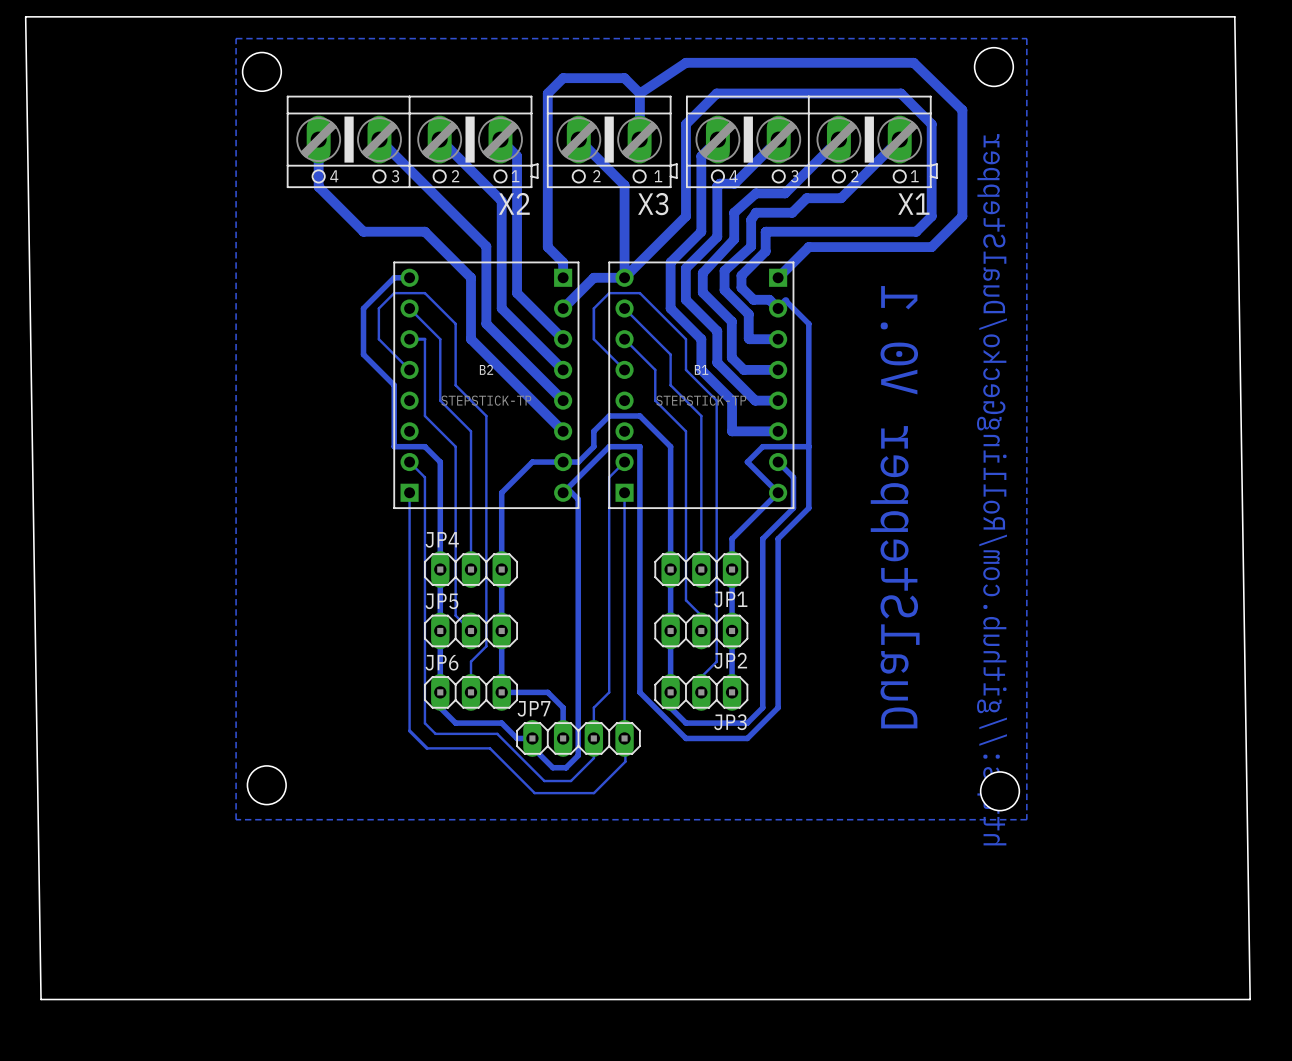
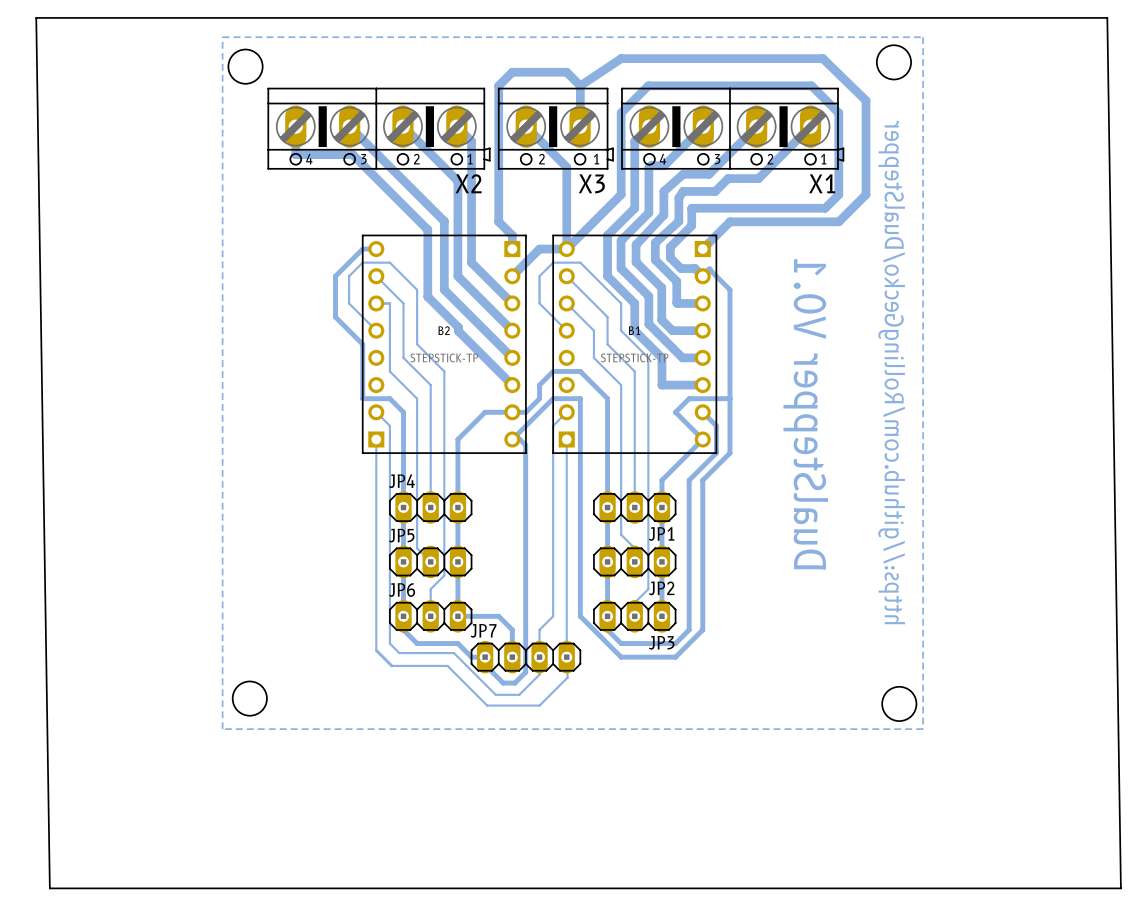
bottom track: (318, 171) (318, 186) (363, 231) (424, 231) (471, 277) (471, 339) (502, 370) -> (295, 154) (352, 154) (427, 229) (427, 296) (458, 327) (458, 331)

